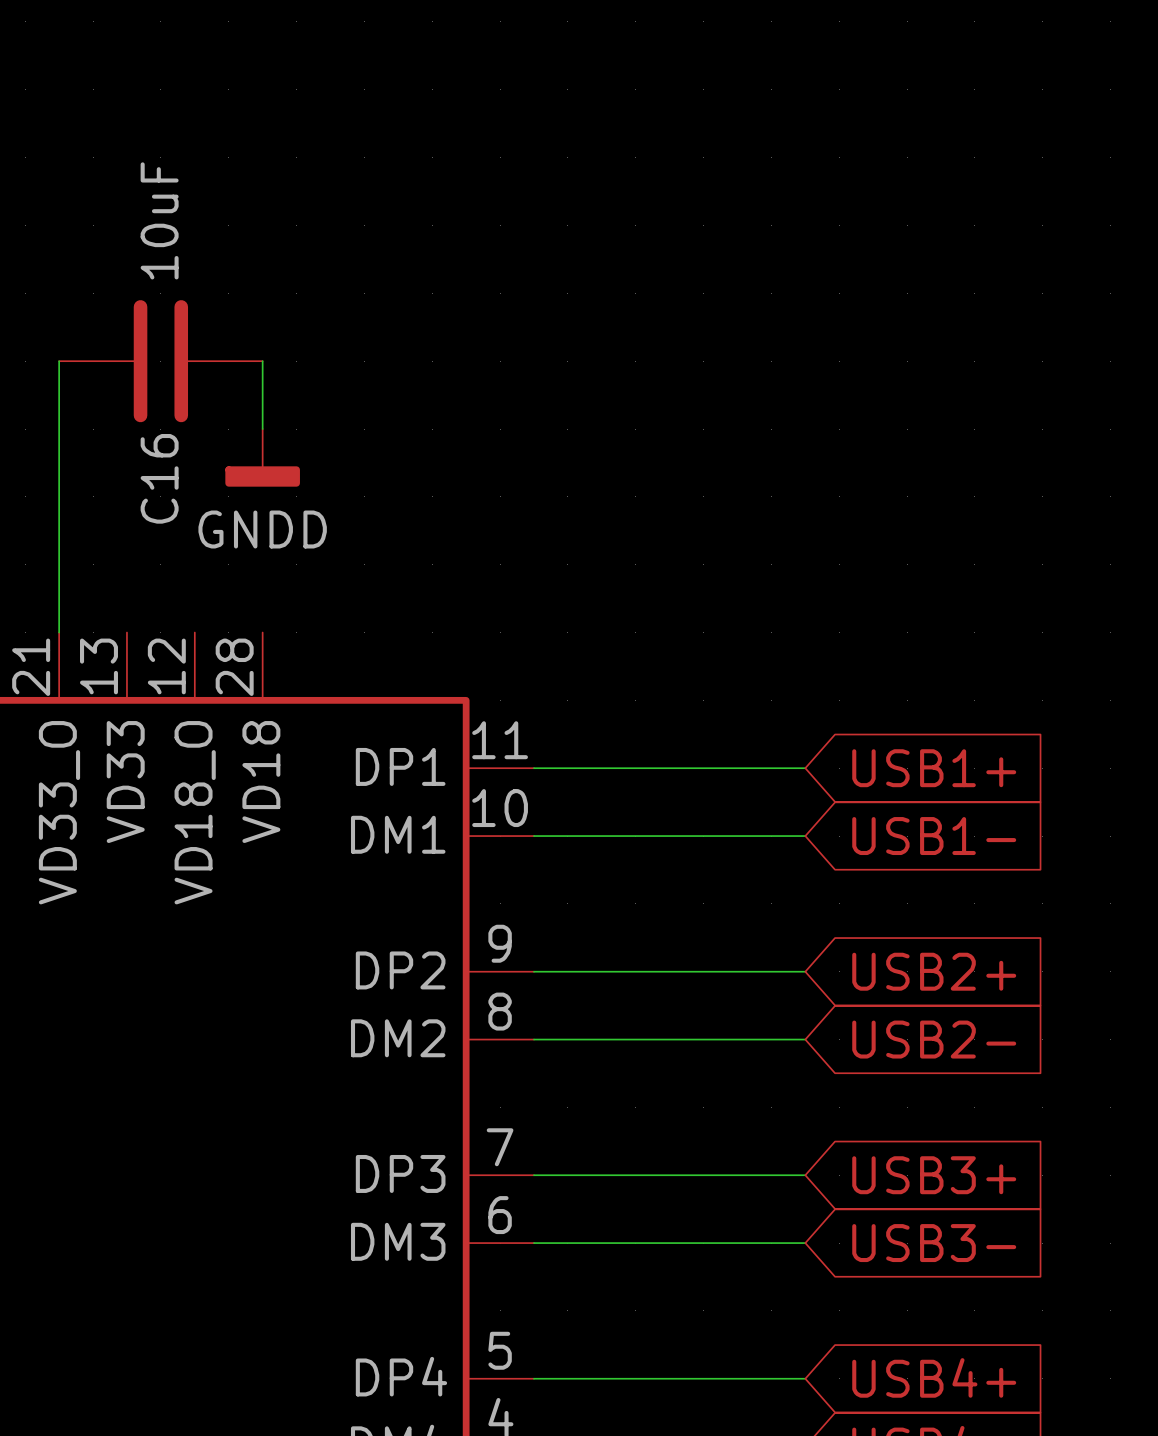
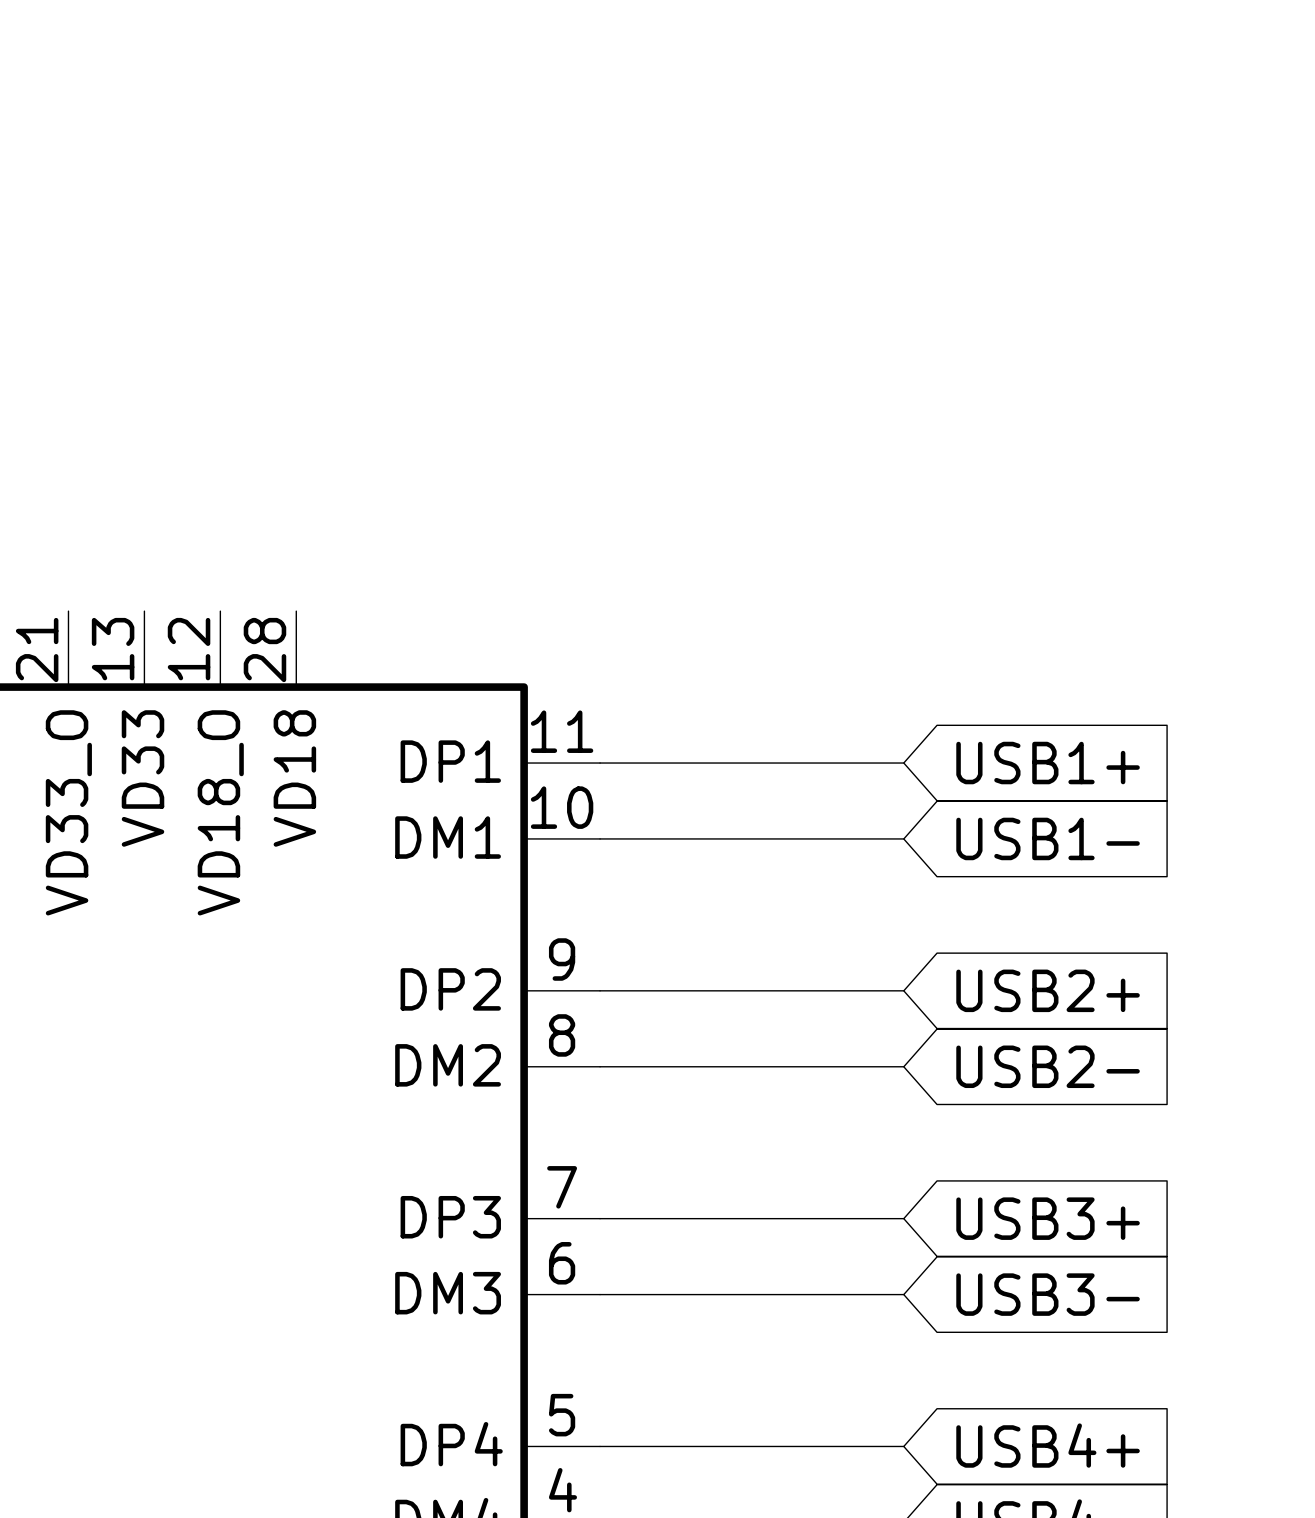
wire: (59, 361) (59, 632) -> none
C16: 10uF (160, 361) -> none
wire: (262, 361) (262, 429) -> none
power symbol: GNDD (262, 457) -> none

